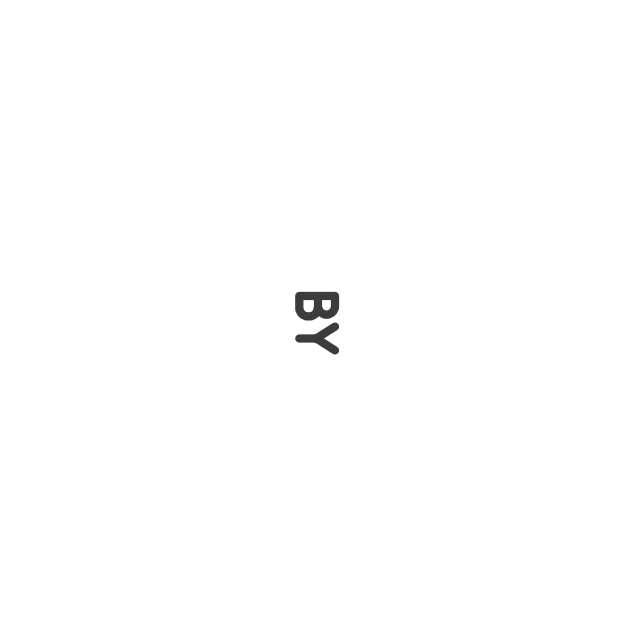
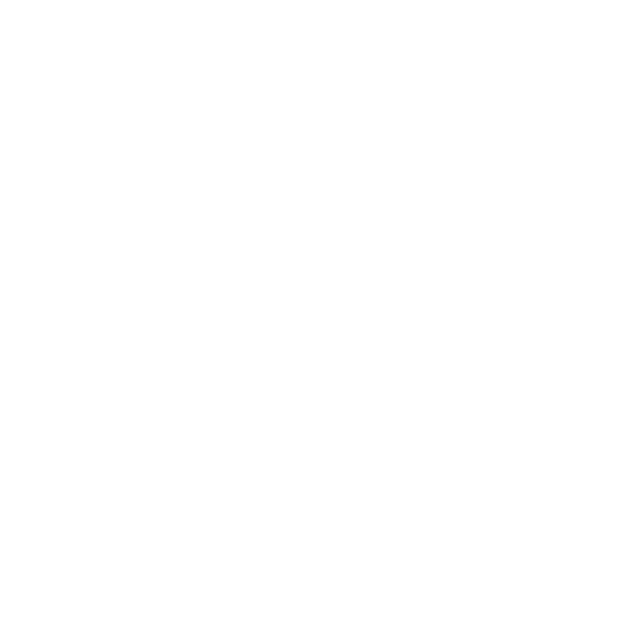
text: BY (317, 323) -> none

